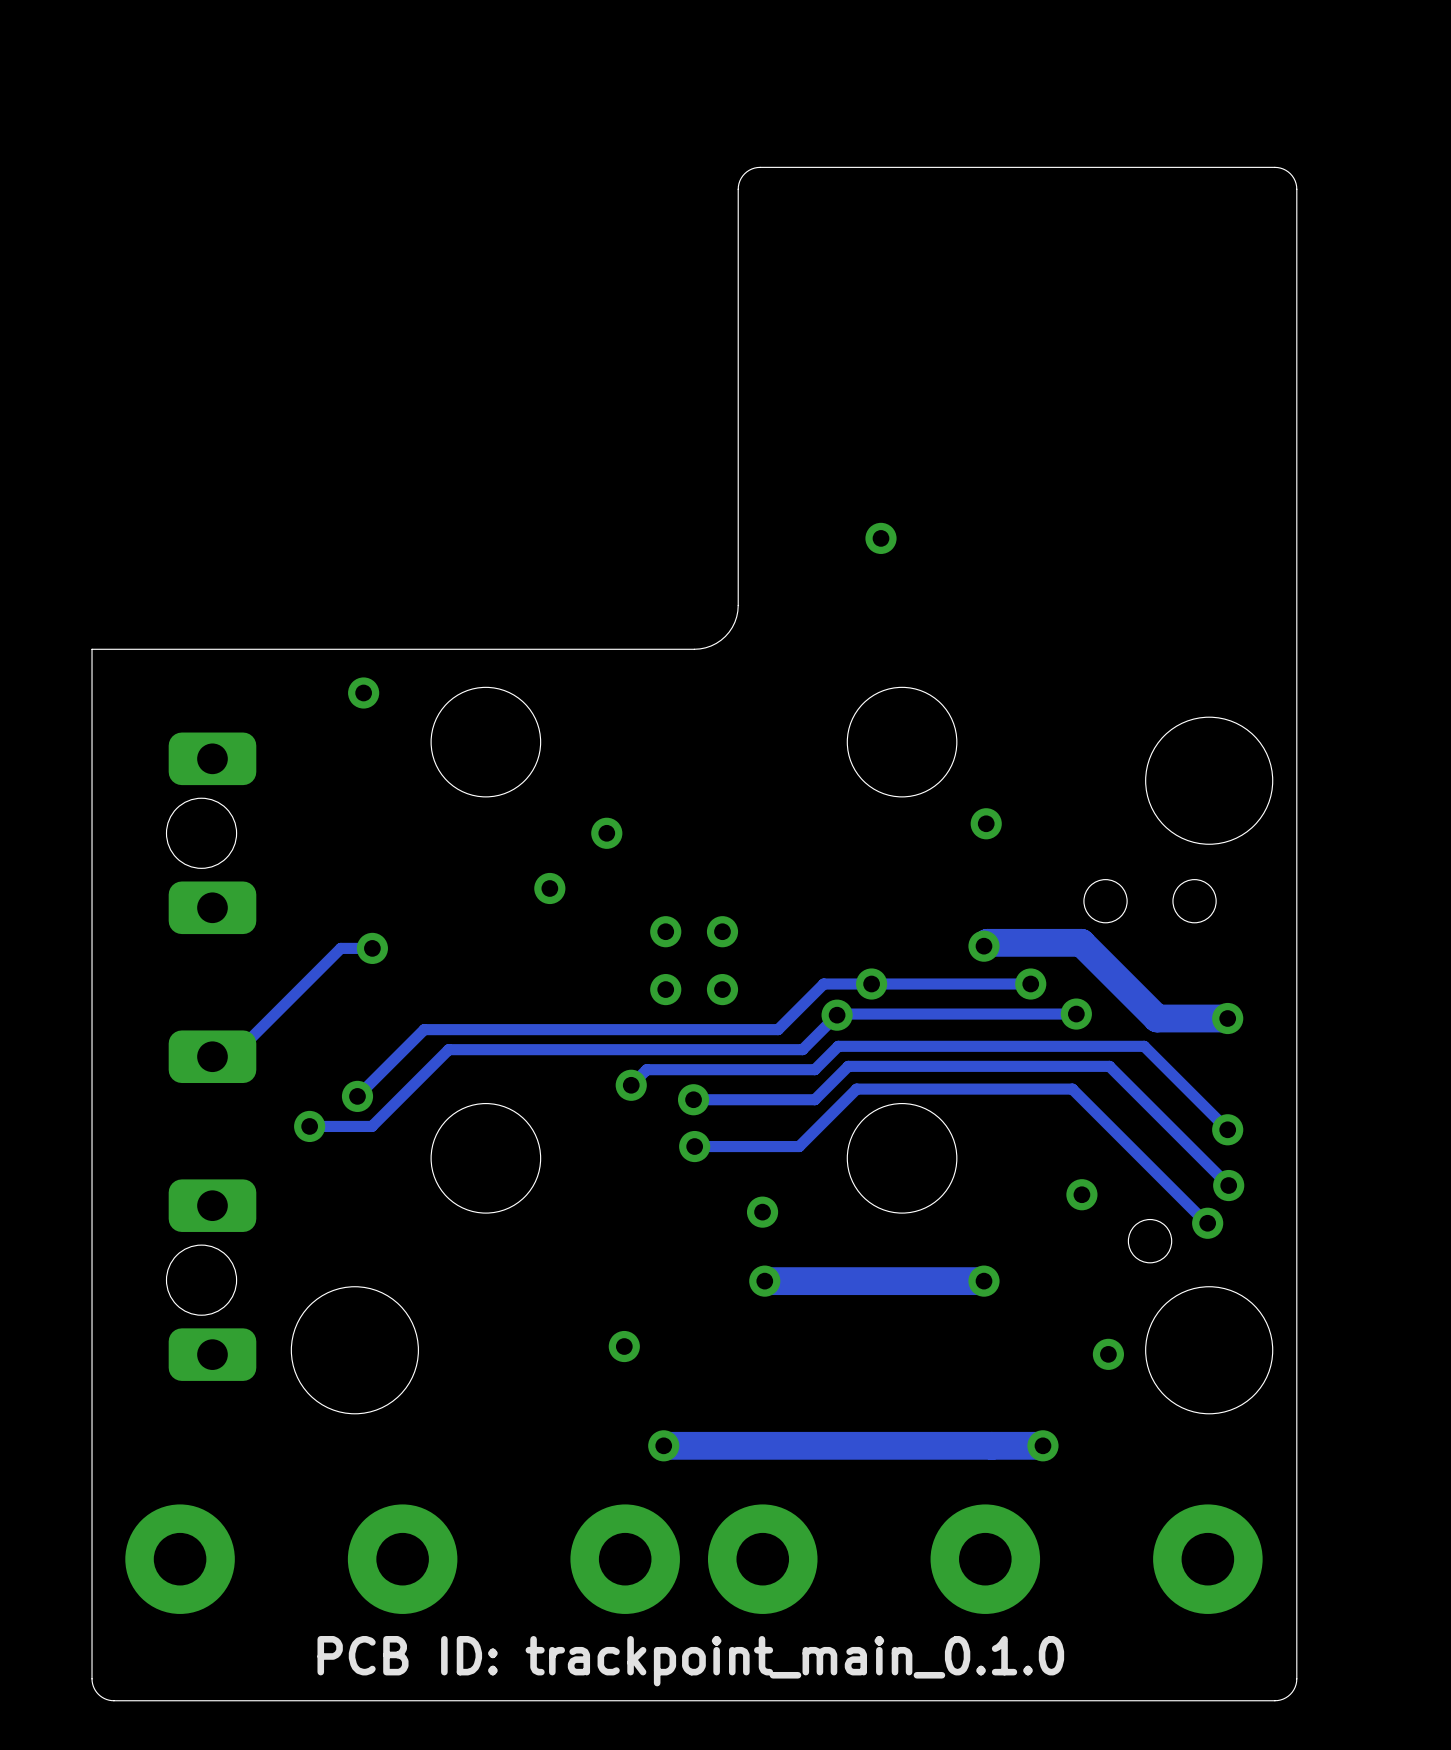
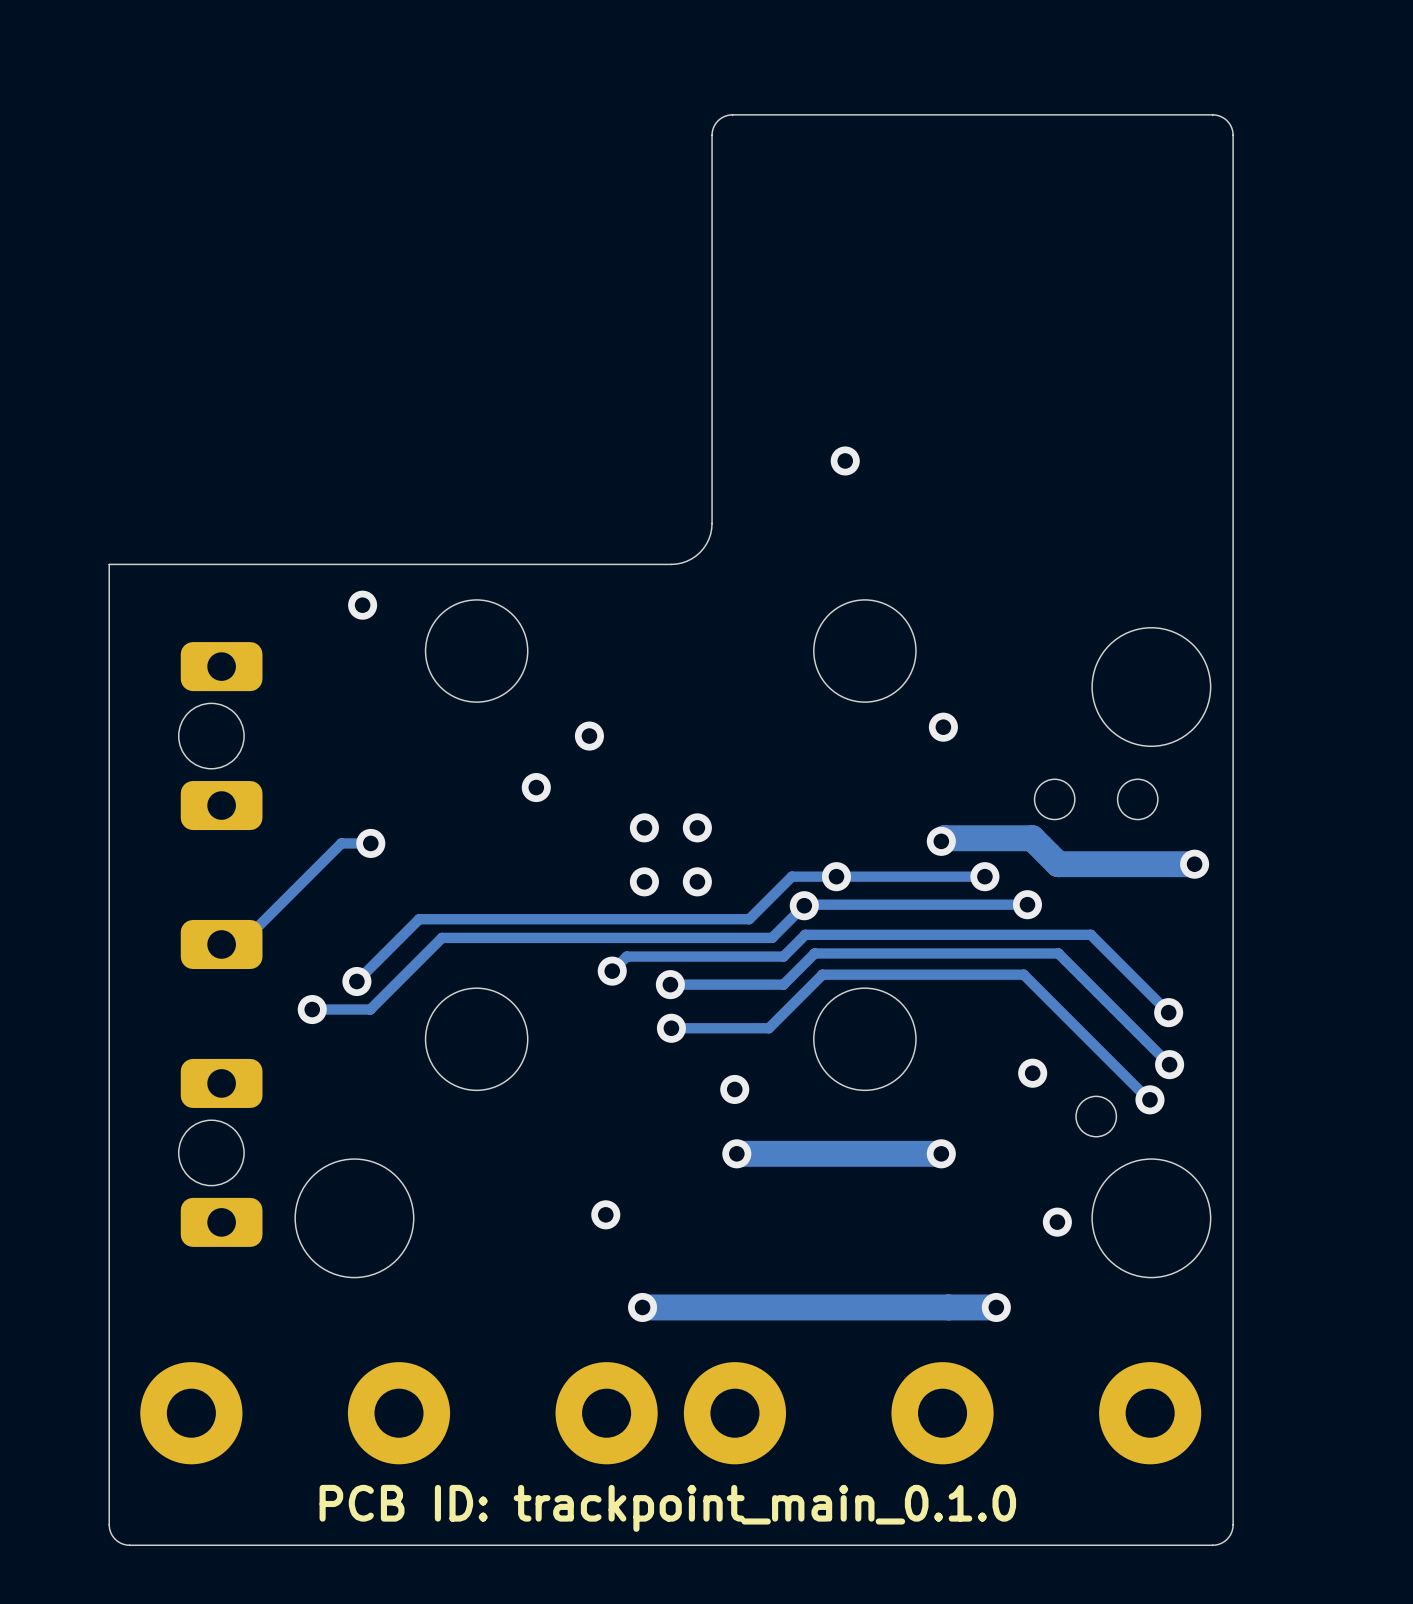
track: (1109, 970) (1157, 1018) (1227, 1018) -> (1058, 864) (1194, 864)
via position: (1227, 1018) -> (1194, 864)

